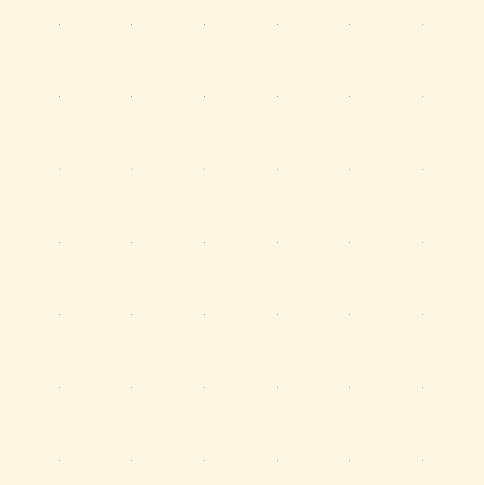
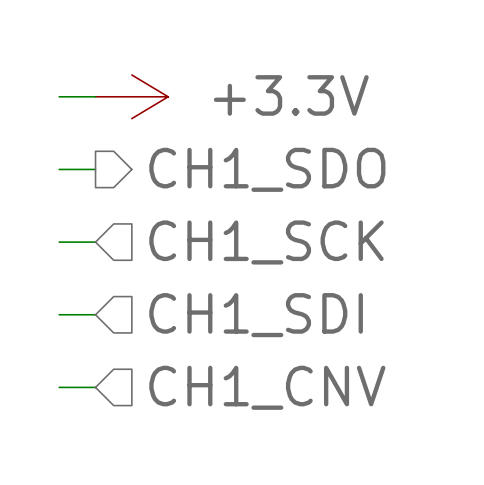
wire: none -> (59, 96) (95, 96)
power symbol: none -> +3.3V (131, 96)
wire: none -> (59, 169) (95, 169)
hierarchical label: none -> CH1_SDO (267, 169)
wire: none -> (59, 242) (95, 242)
hierarchical label: none -> CH1_SCK (266, 242)
wire: none -> (59, 314) (95, 314)
hierarchical label: none -> CH1_SDI (256, 315)
wire: none -> (59, 387) (95, 387)
hierarchical label: none -> CH1_CNV (267, 387)

